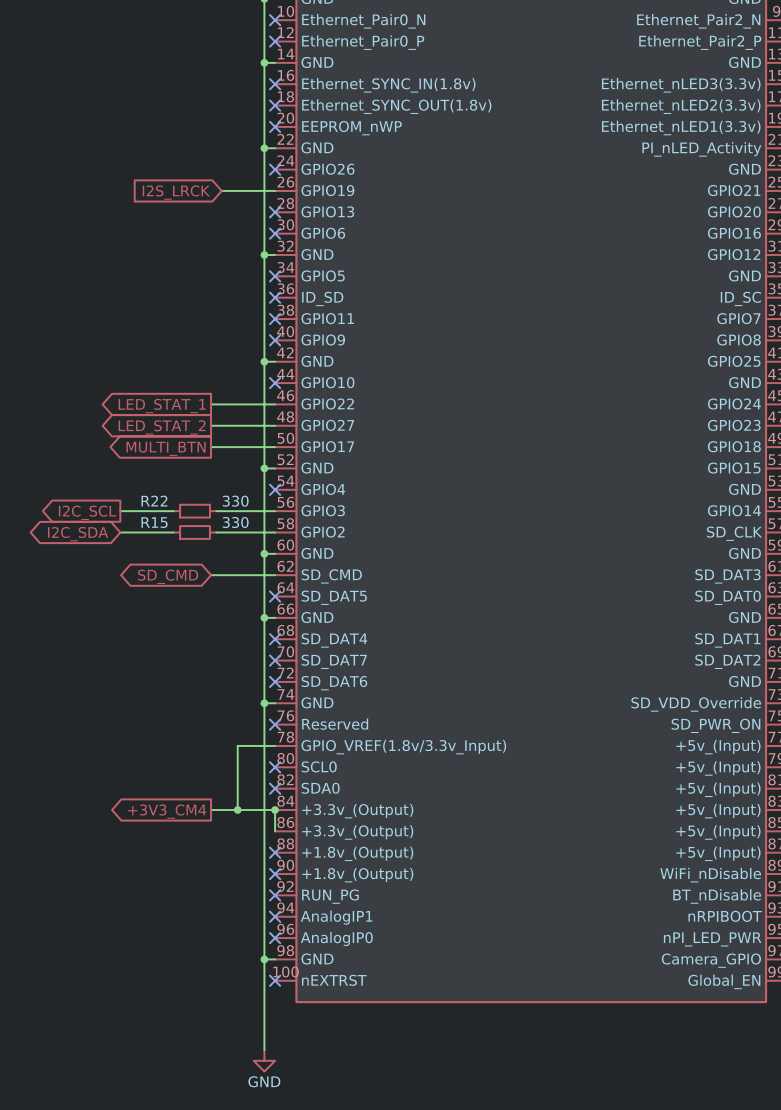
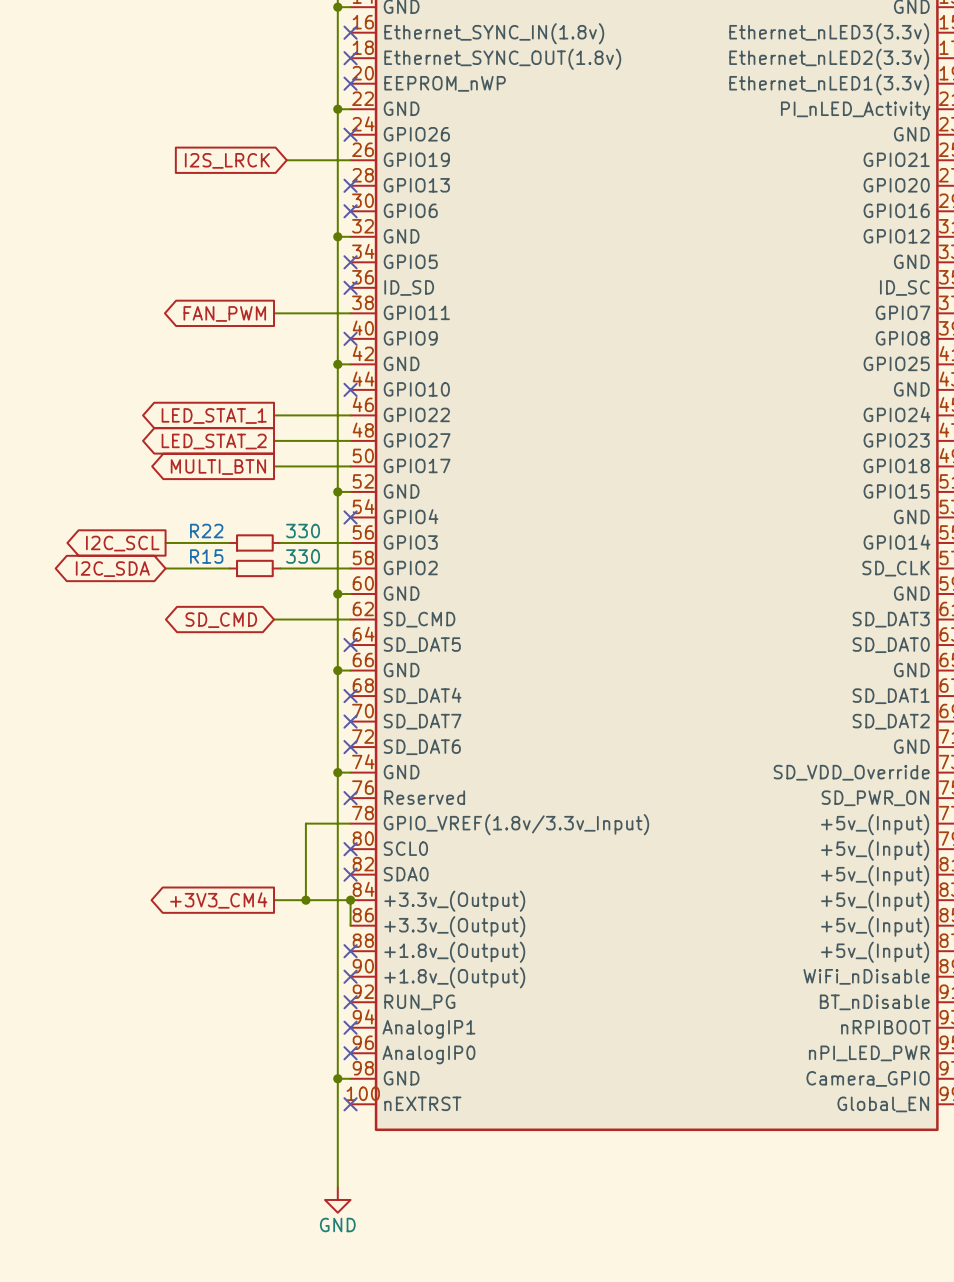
wire: none -> (274, 313) (350, 313)
no-connect mark: (275, 319) -> none
global label: none -> FAN_PWM (224, 313)

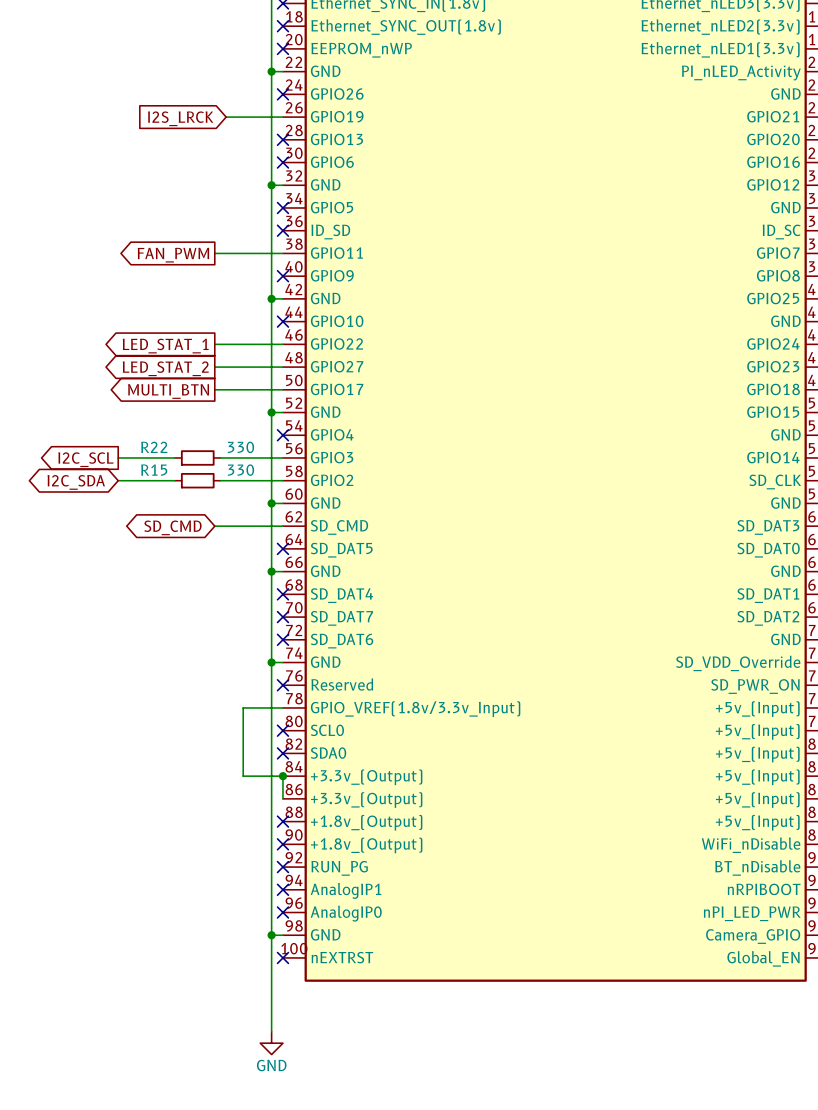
global label: +3V3_CM4 (218, 900) -> none
wire: (274, 900) (305, 900) -> none
junction: (305, 900) -> none

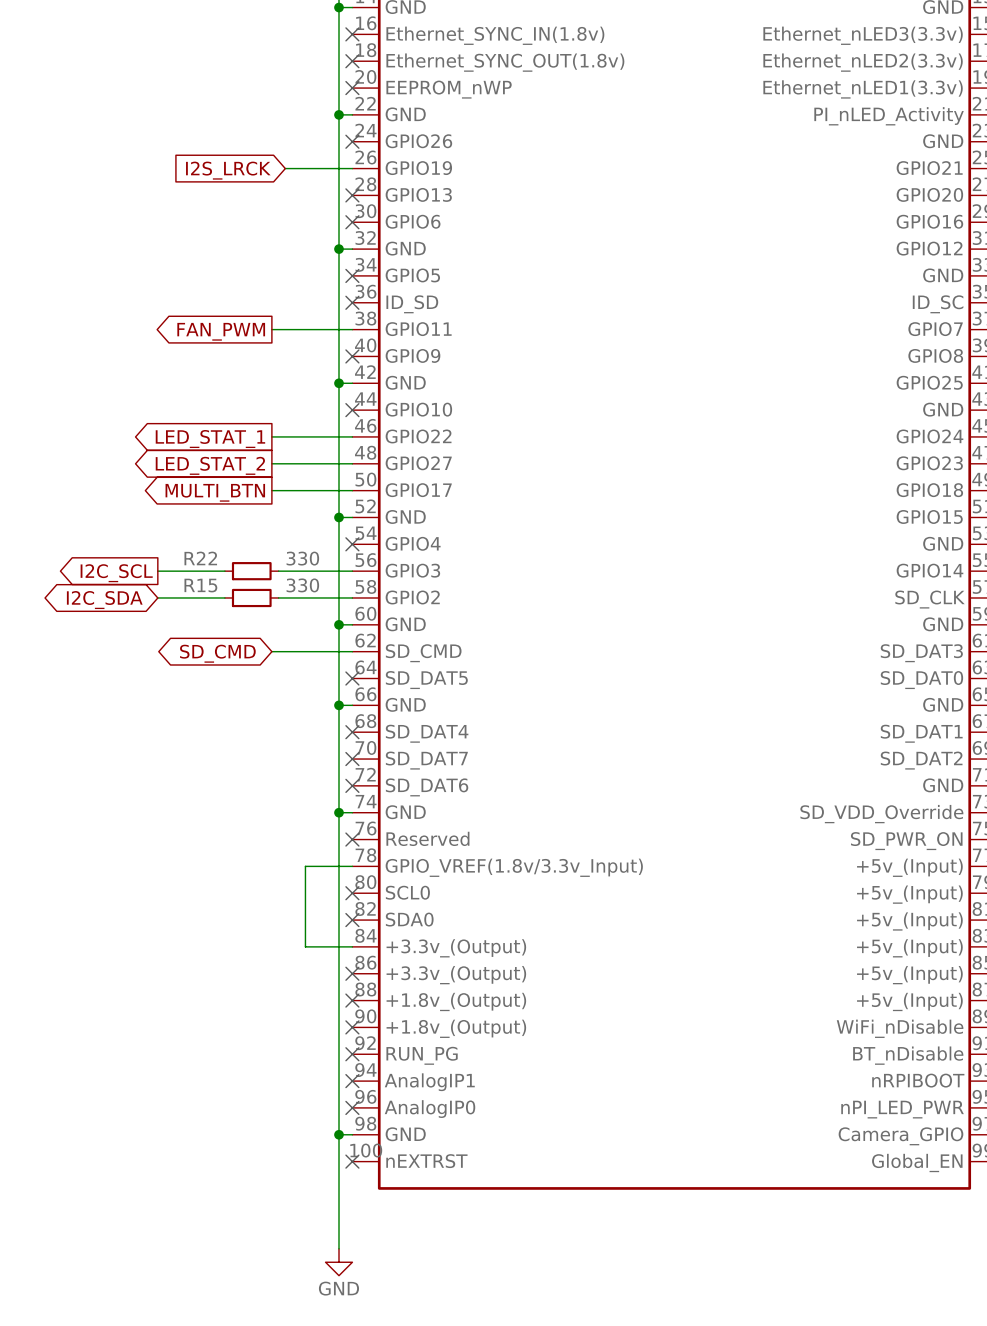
wire: (282, 776) (282, 798) -> none
junction: (282, 776) -> none
no-connect mark: none -> (352, 973)

